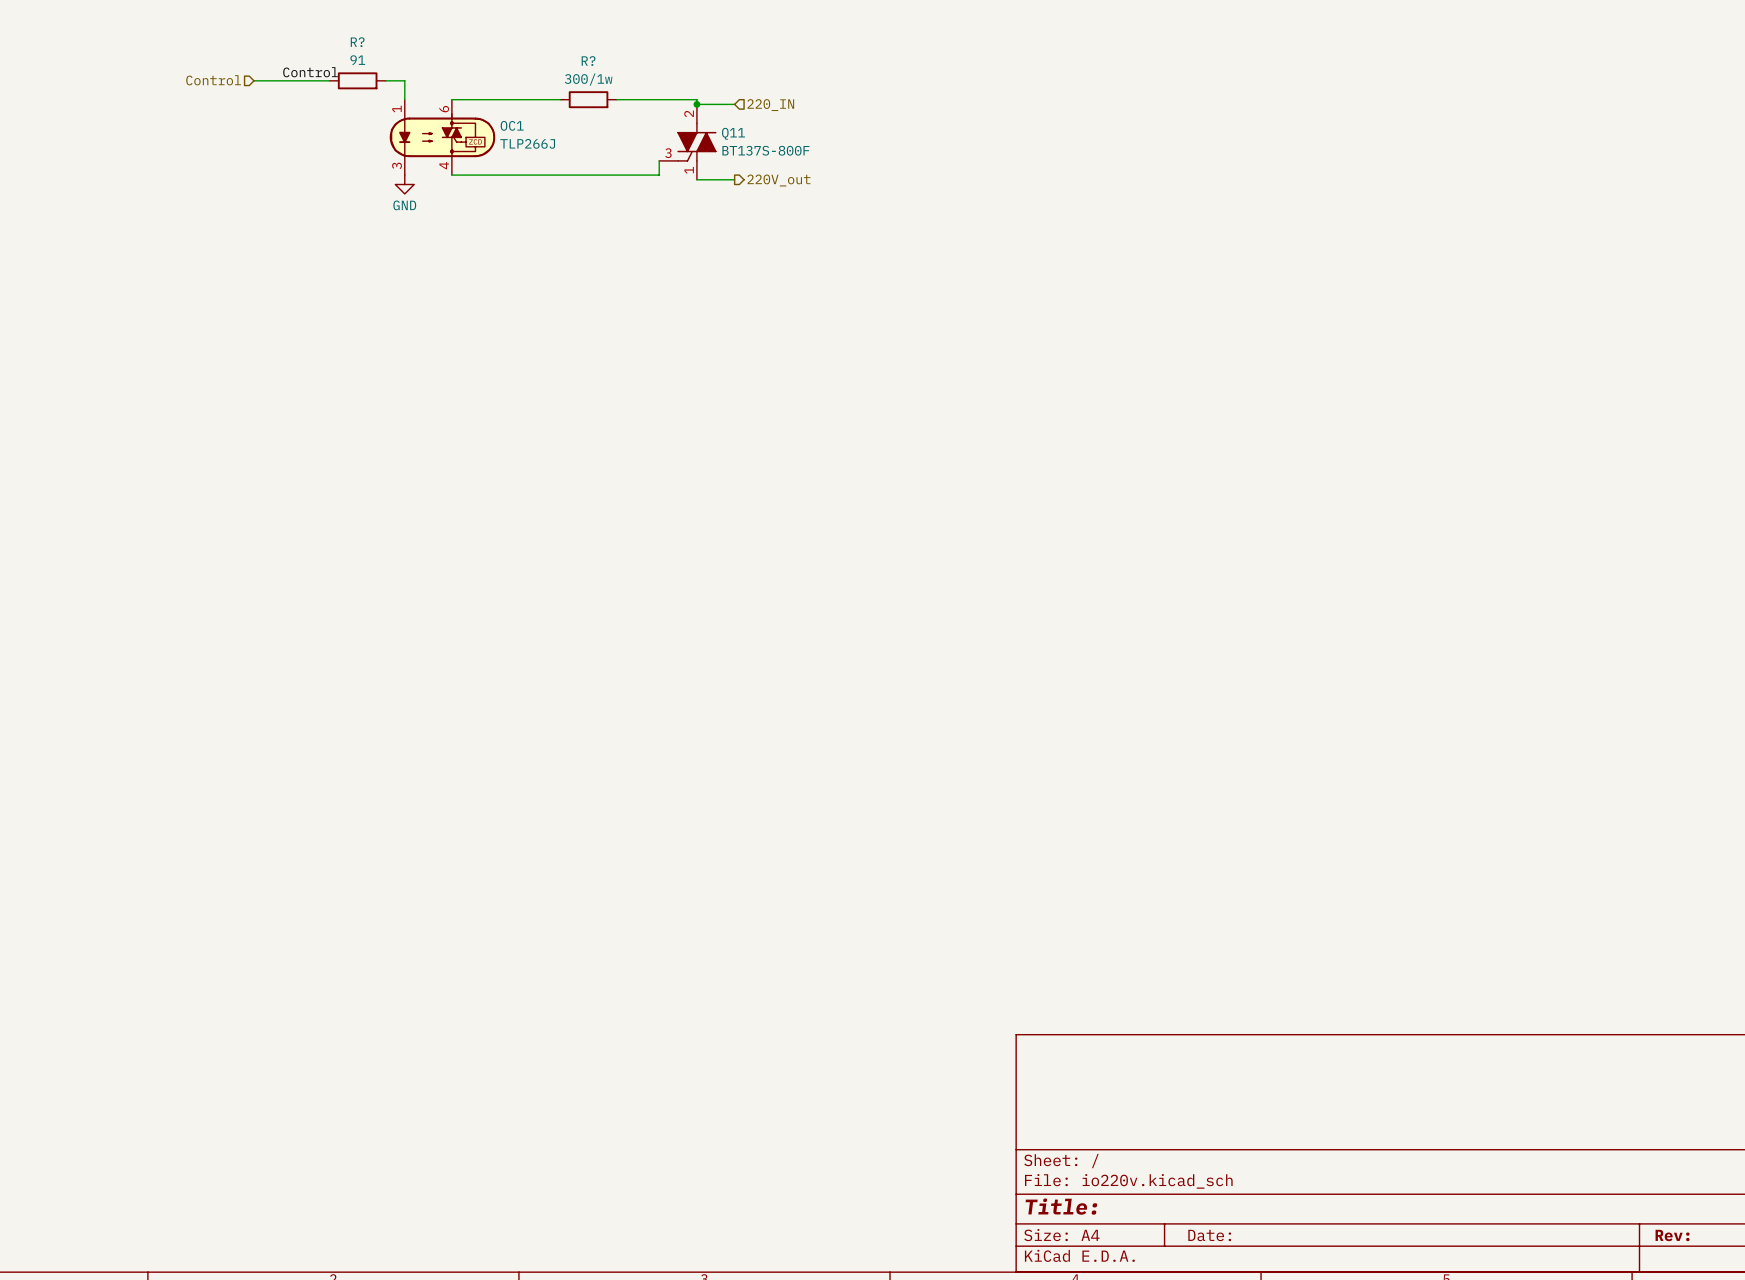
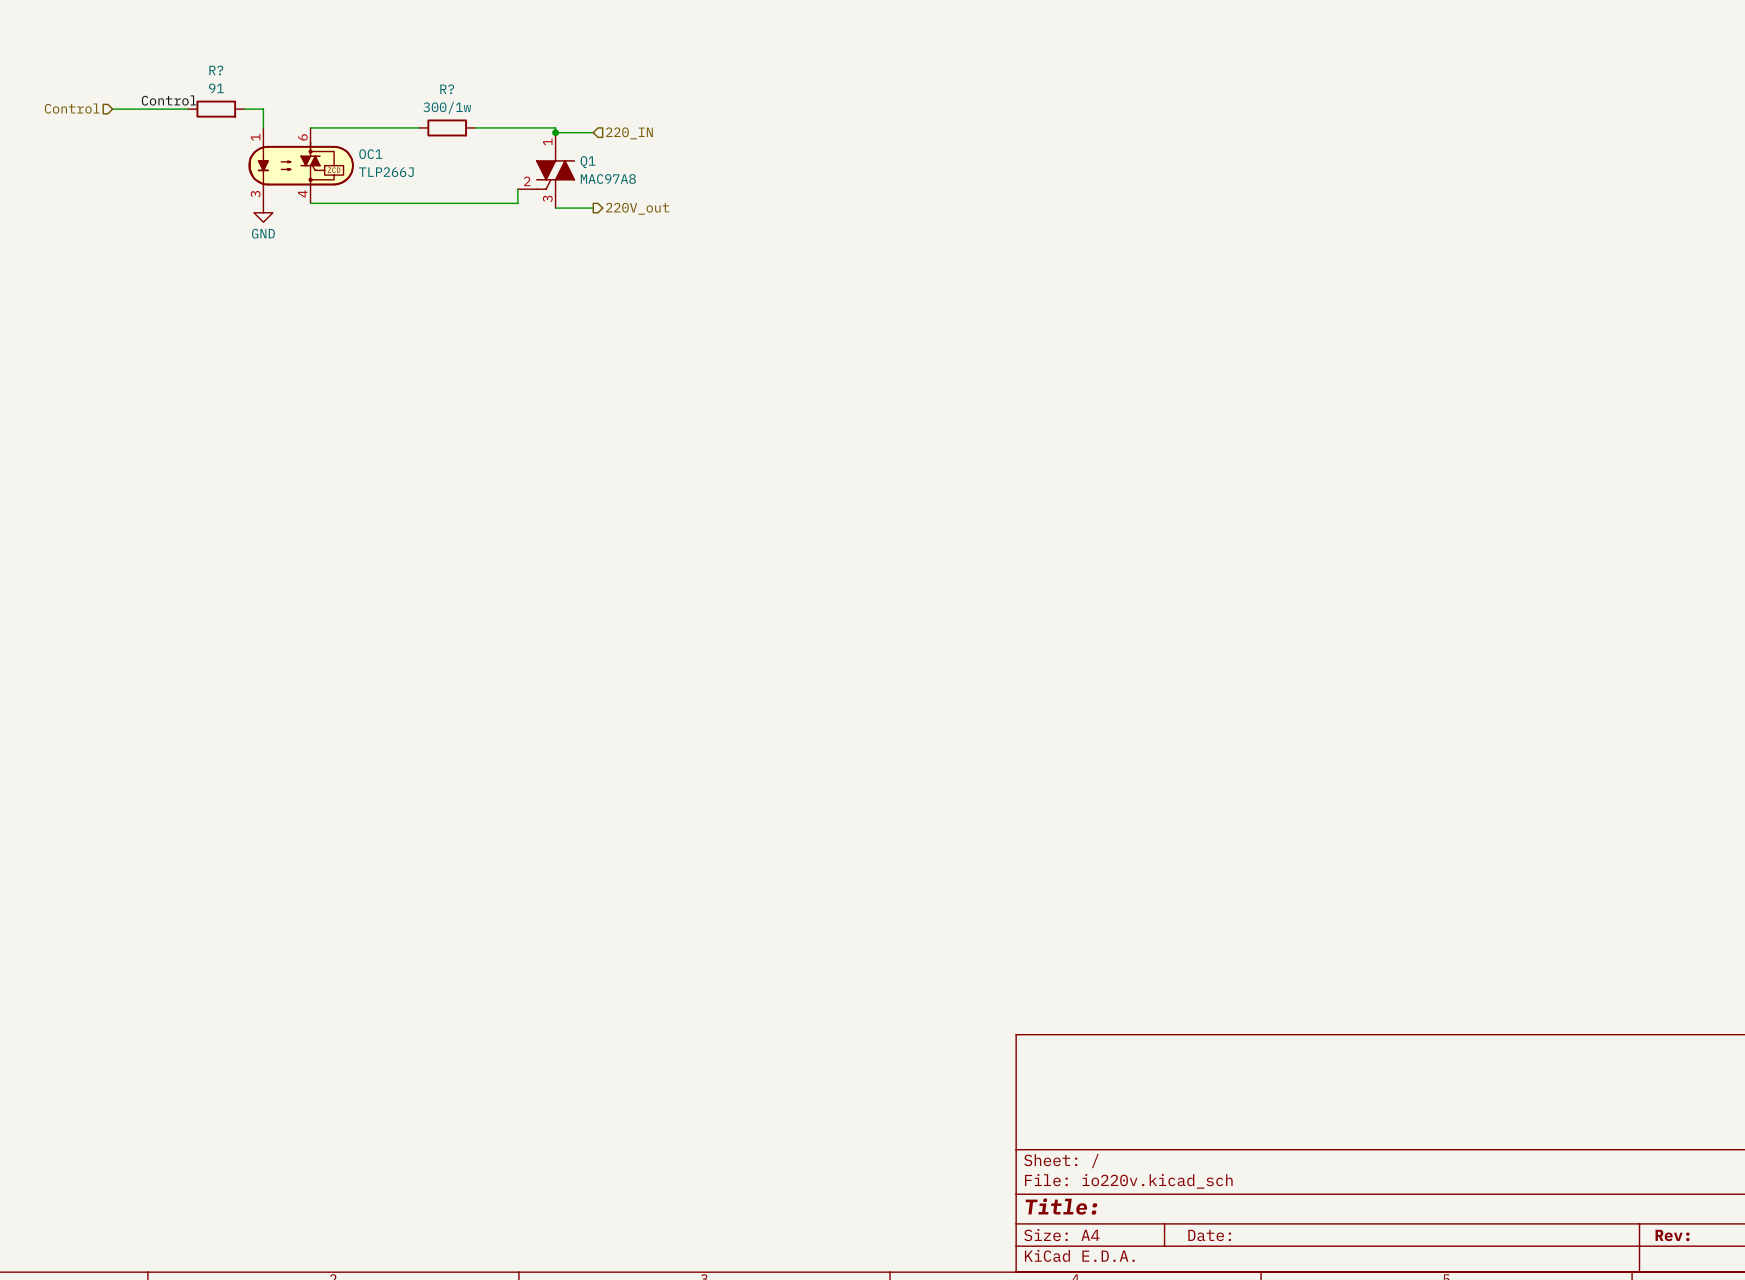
label position: Control (310, 72) -> Control (169, 100)
hierarchical label position: Control (213, 80) -> Control (72, 108)
wire: (253, 80) (329, 80) -> (112, 109) (188, 109)
R? position: (357, 80) -> (216, 109)
wire: (385, 80) (404, 80) (404, 99) -> (244, 109) (263, 109) (263, 127)
wire: (451, 99) (560, 99) -> (310, 127) (418, 127)
R? position: (588, 99) -> (447, 127)
wire: (616, 99) (696, 99) (696, 104) (734, 104) -> (475, 127) (555, 127) (555, 132) (593, 132)
junction: (696, 104) -> none
hierarchical label position: 220_IN (770, 105) -> 220_IN (629, 133)
junction: none -> (555, 132)
OC1 position: (442, 137) -> (301, 165)
Q11: BT137S-800F (687, 142) -> none
wire: (659, 160) (659, 175) (451, 175) -> (517, 189) (517, 203) (310, 203)
Q1: none -> MAC97A8 (546, 170)
wire: (696, 179) (734, 179) -> (555, 208) (593, 208)
hierarchical label position: 220V_out (778, 180) -> 220V_out (637, 208)
power symbol position: GND (404, 184) -> GND (263, 212)

